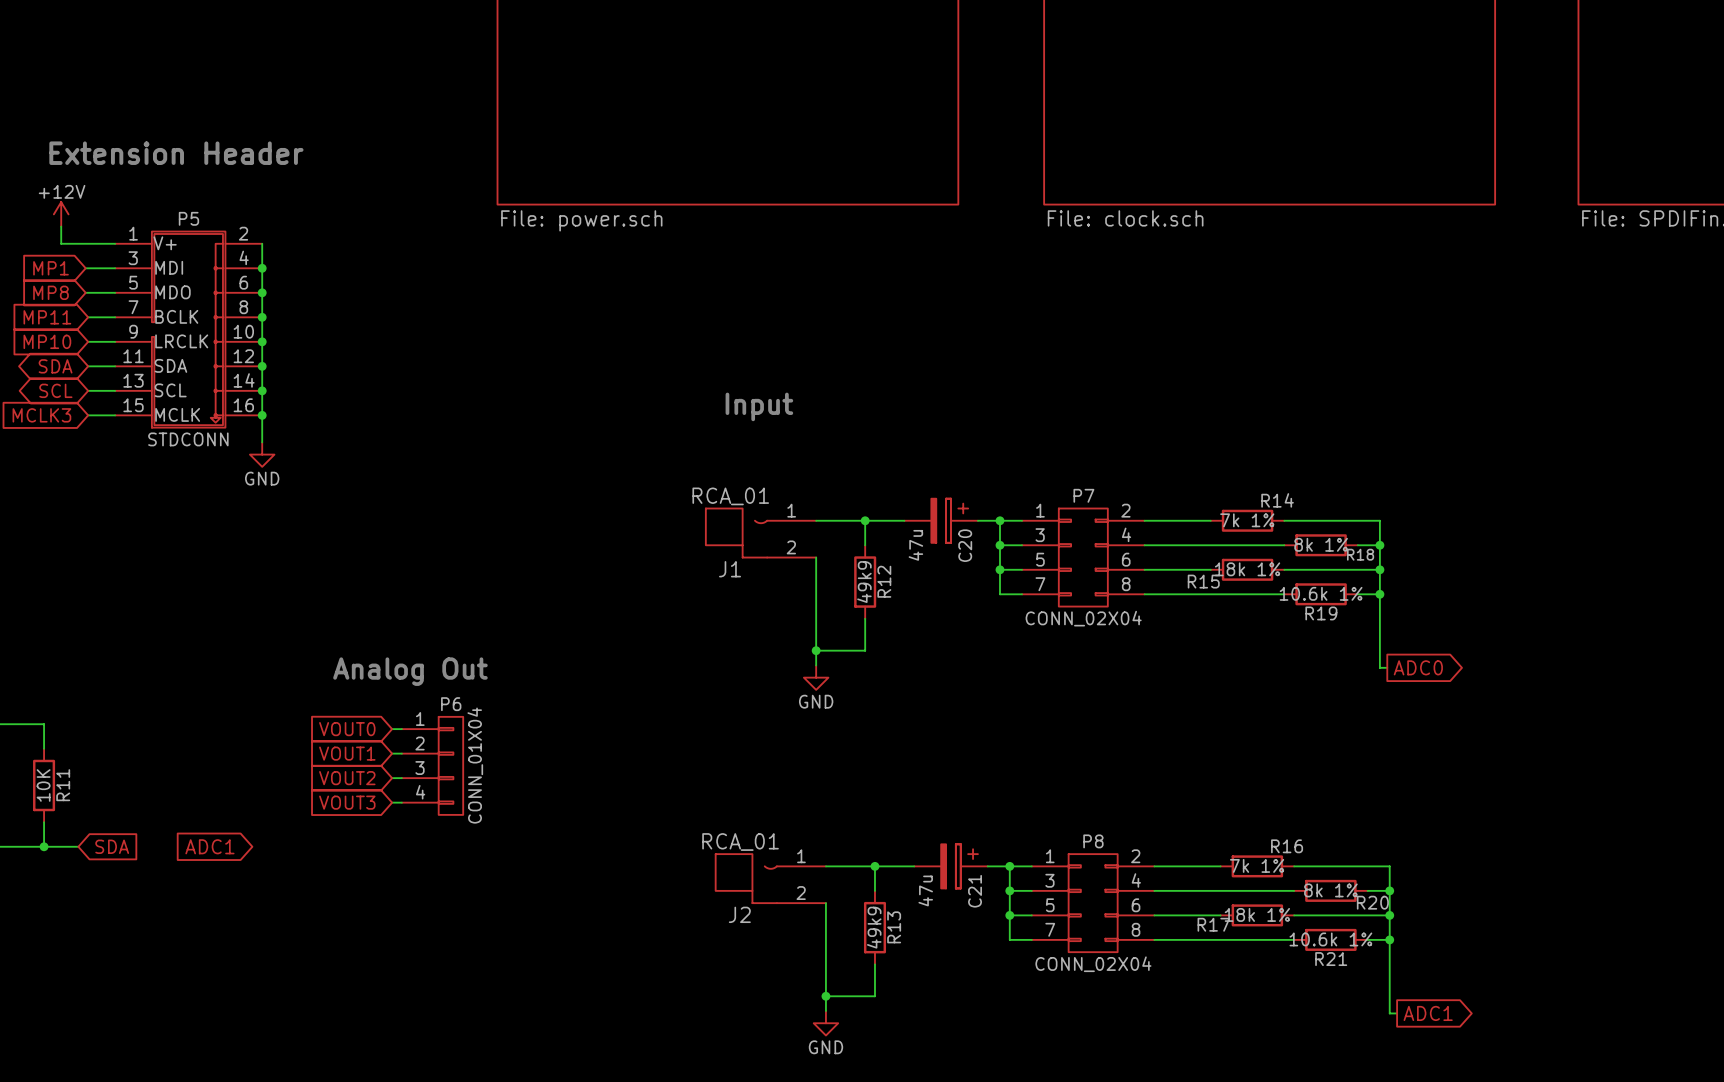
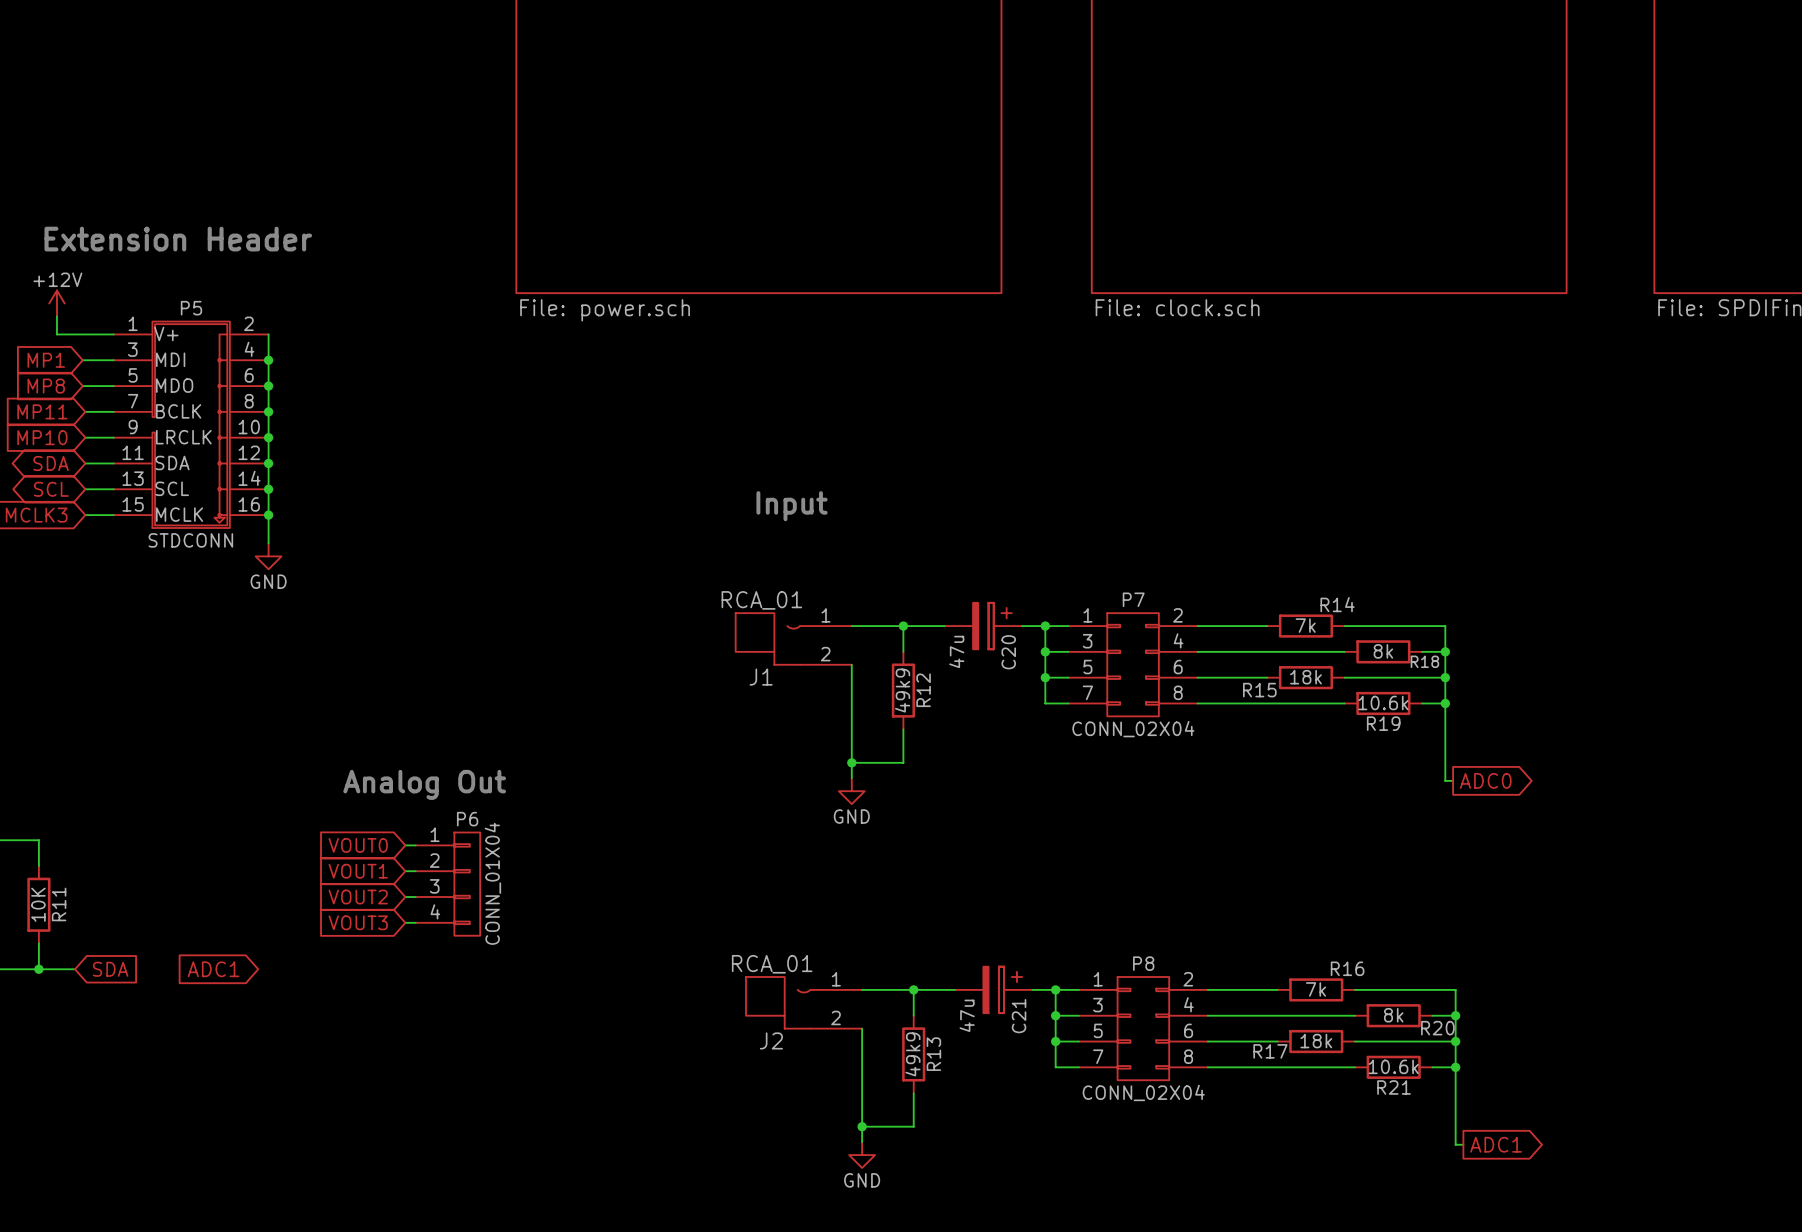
R14 value: 7k 1% (1247, 520) -> 7k (1305, 625)
R18 value: 8k 1% (1321, 544) -> 8k (1383, 651)
R15 value: 18k 1% (1247, 569) -> 18k (1305, 677)
R19 value: 10.6k 1% (1321, 593) -> 10.6k (1383, 702)
R16 value: 7k 1% (1257, 865) -> 7k (1315, 989)
R20 value: 8k 1% (1330, 890) -> 8k (1393, 1015)
R17 value: 18k 1% (1257, 914) -> 18k (1316, 1041)
R21 value: 10.6k 1% (1330, 939) -> 10.6k (1393, 1066)

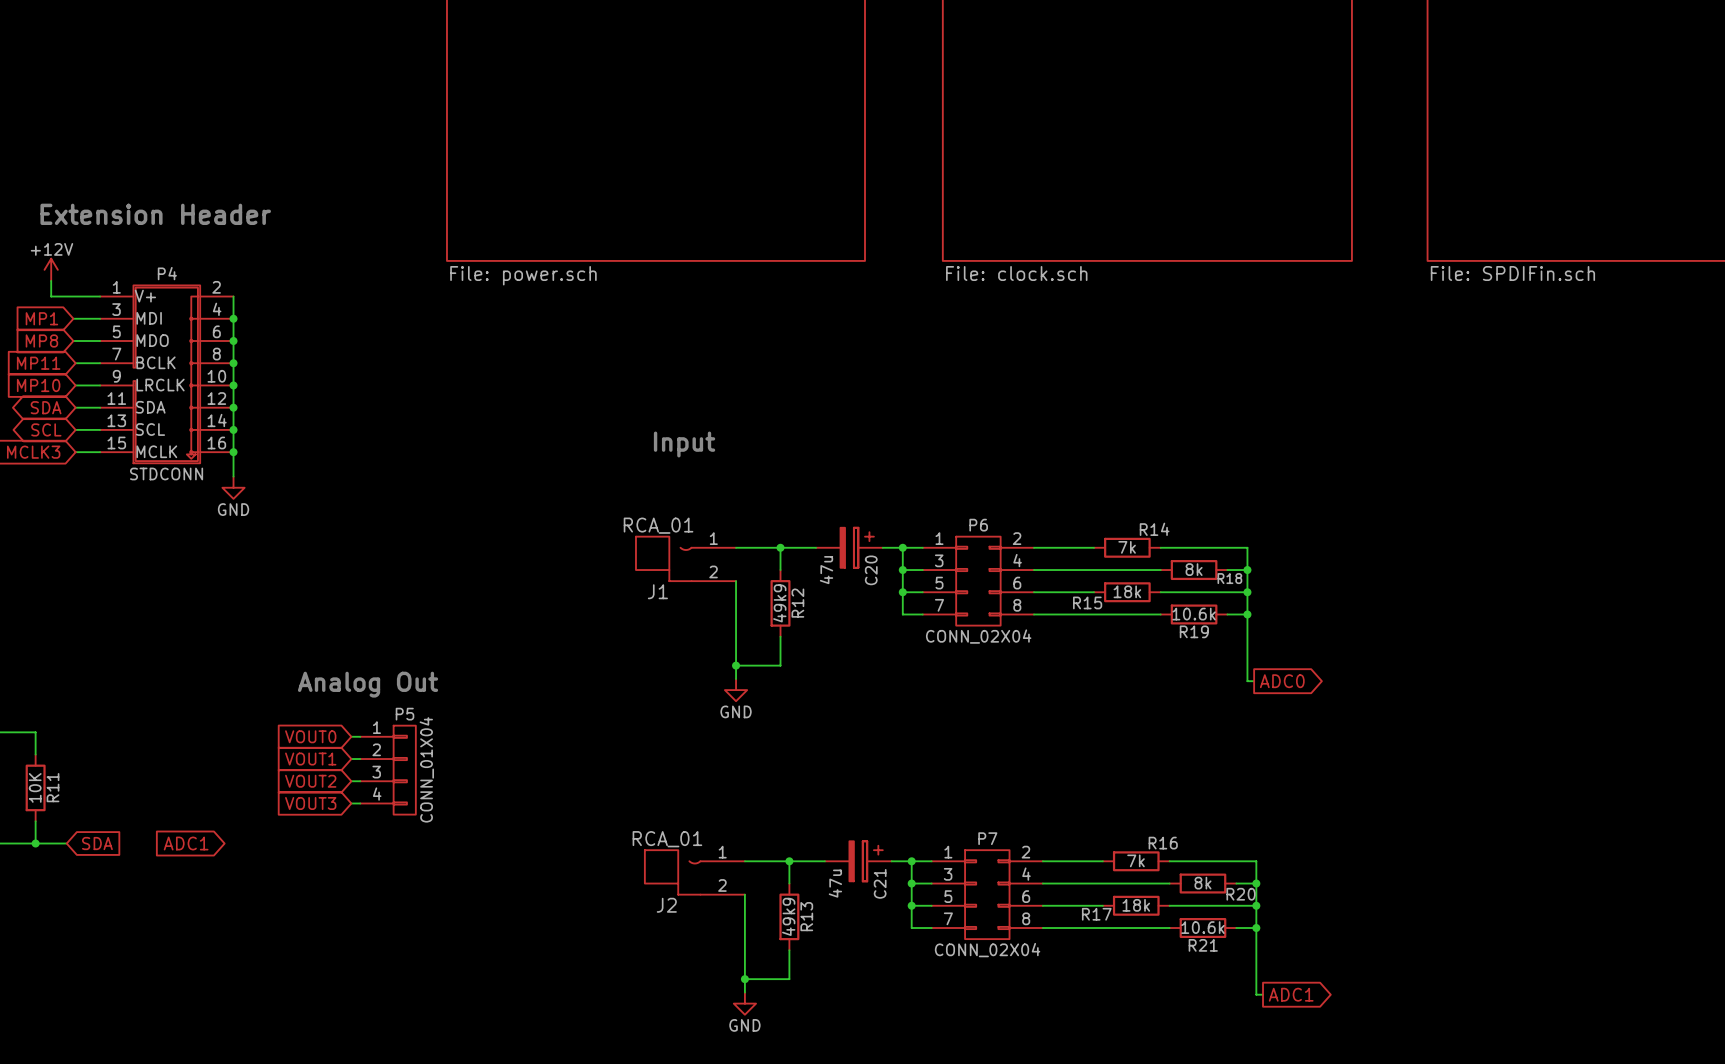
P5 name: P5 (191, 308) -> P4 (167, 273)
P7 name: P7 (1133, 599) -> P6 (978, 525)
P6 name: P6 (467, 819) -> P5 (405, 714)
P8 name: P8 (1143, 963) -> P7 (987, 838)

